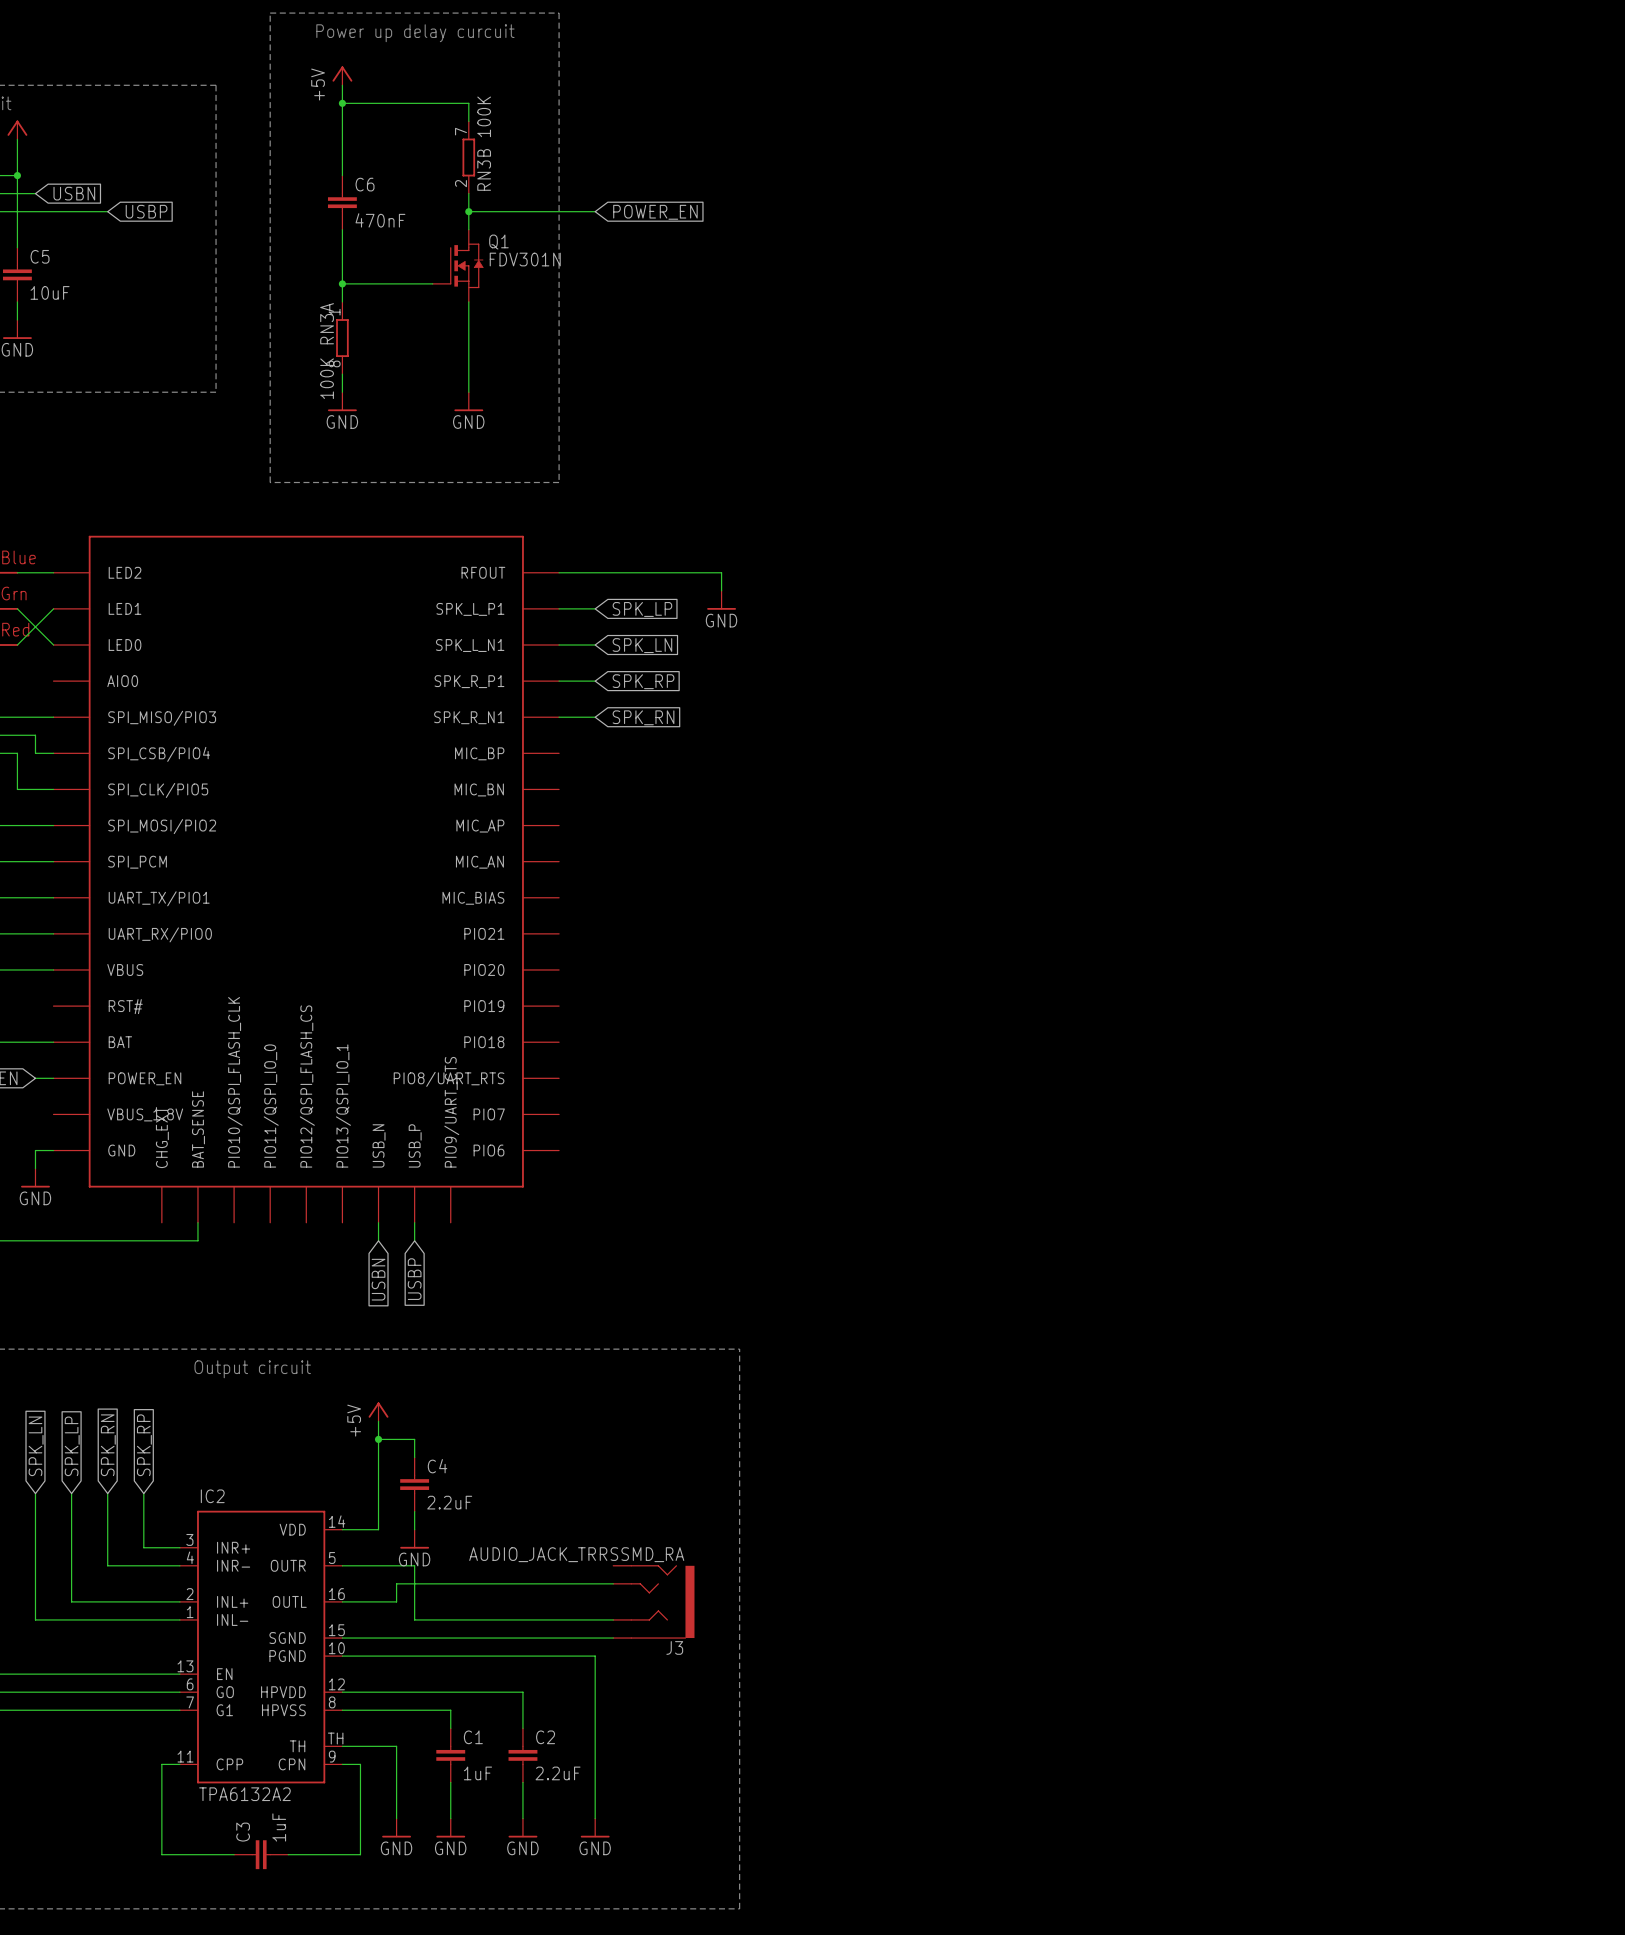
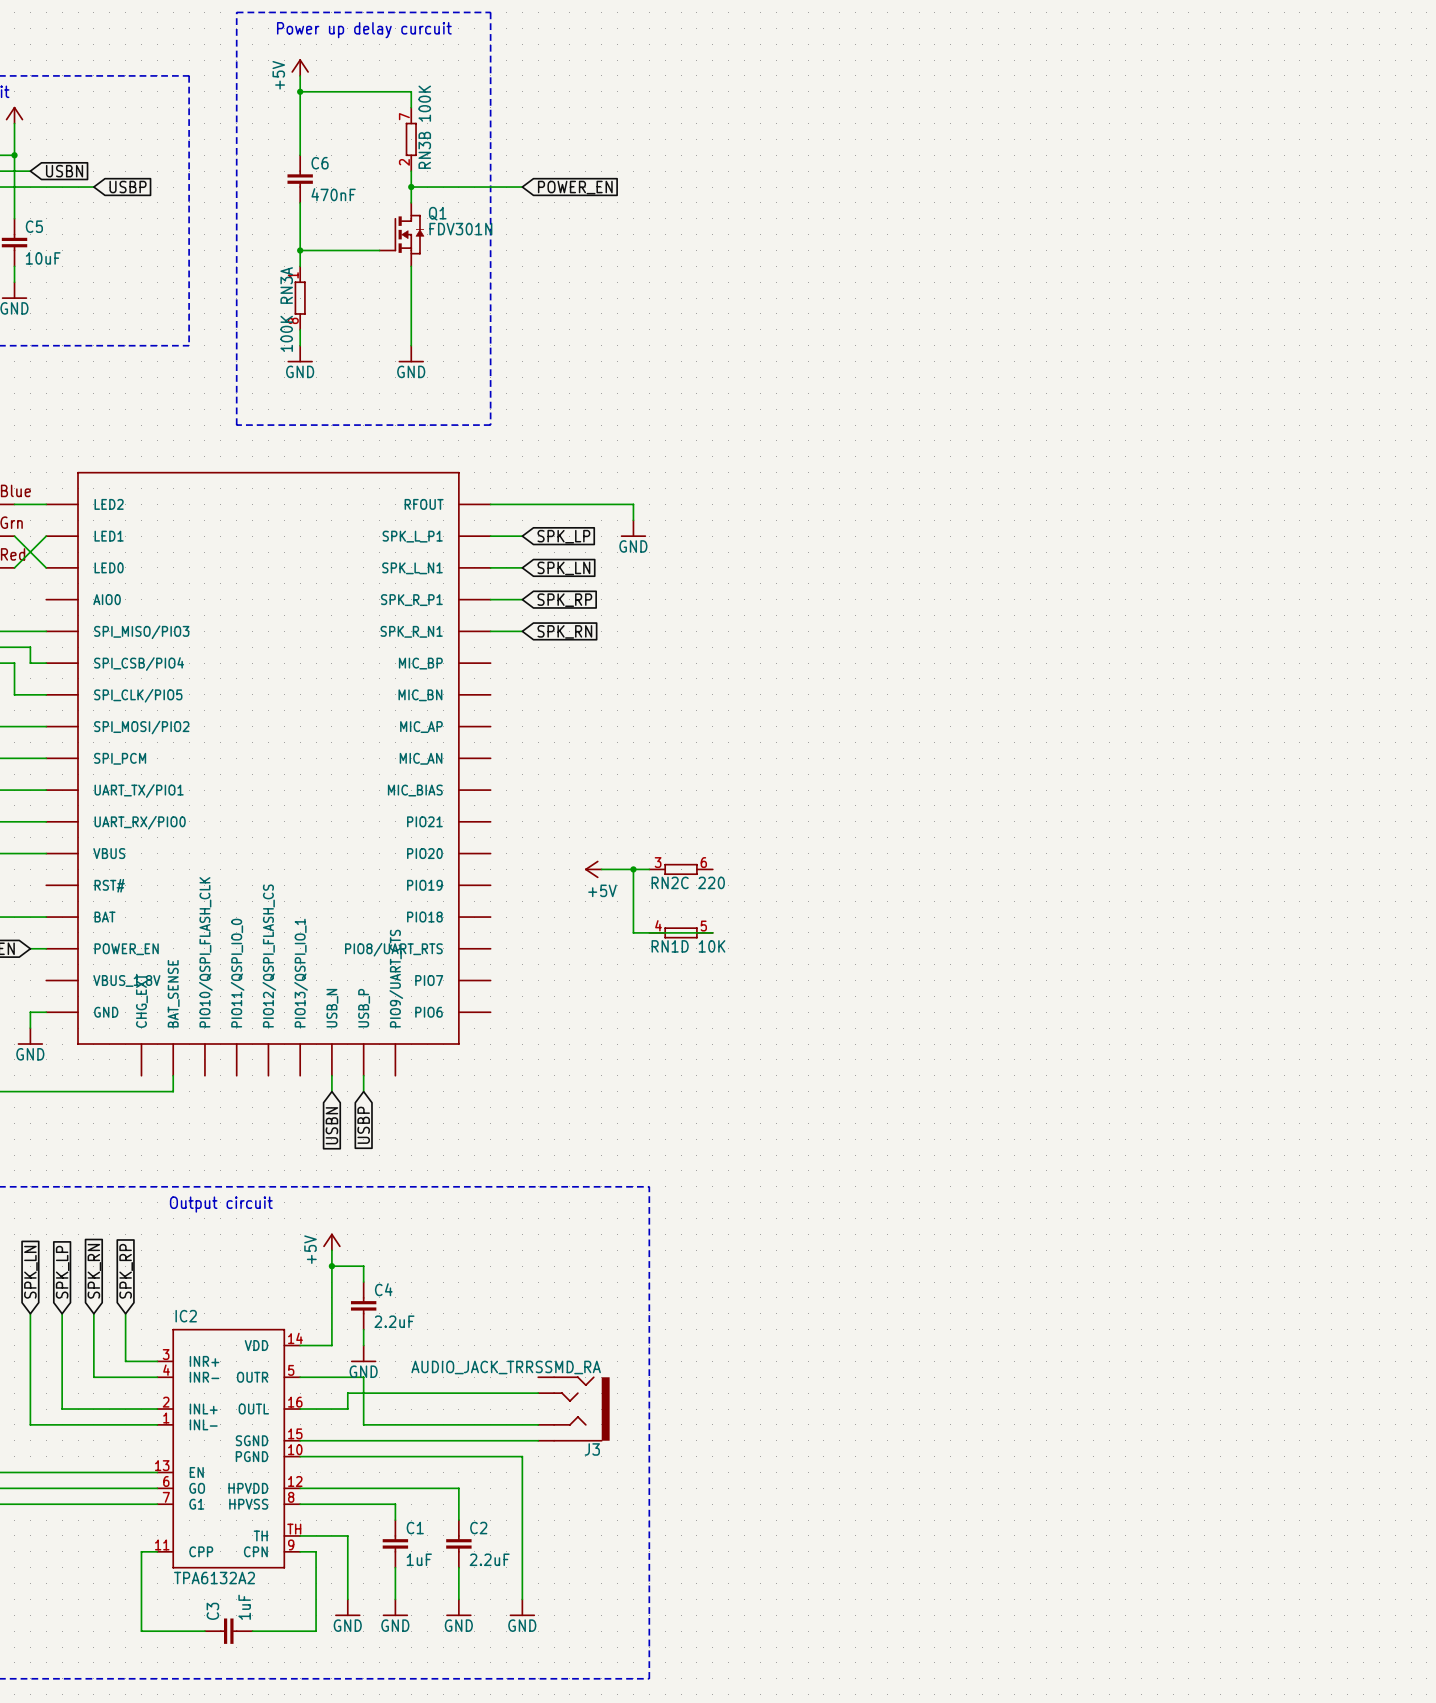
power symbol: none -> +5V (593, 869)
wire: none -> (601, 869) (649, 869)
wire: none -> (633, 869) (633, 932) (712, 932)
junction: none -> (633, 869)
RN2C: none -> 220 (681, 869)
RN1D: none -> 10K (681, 932)

